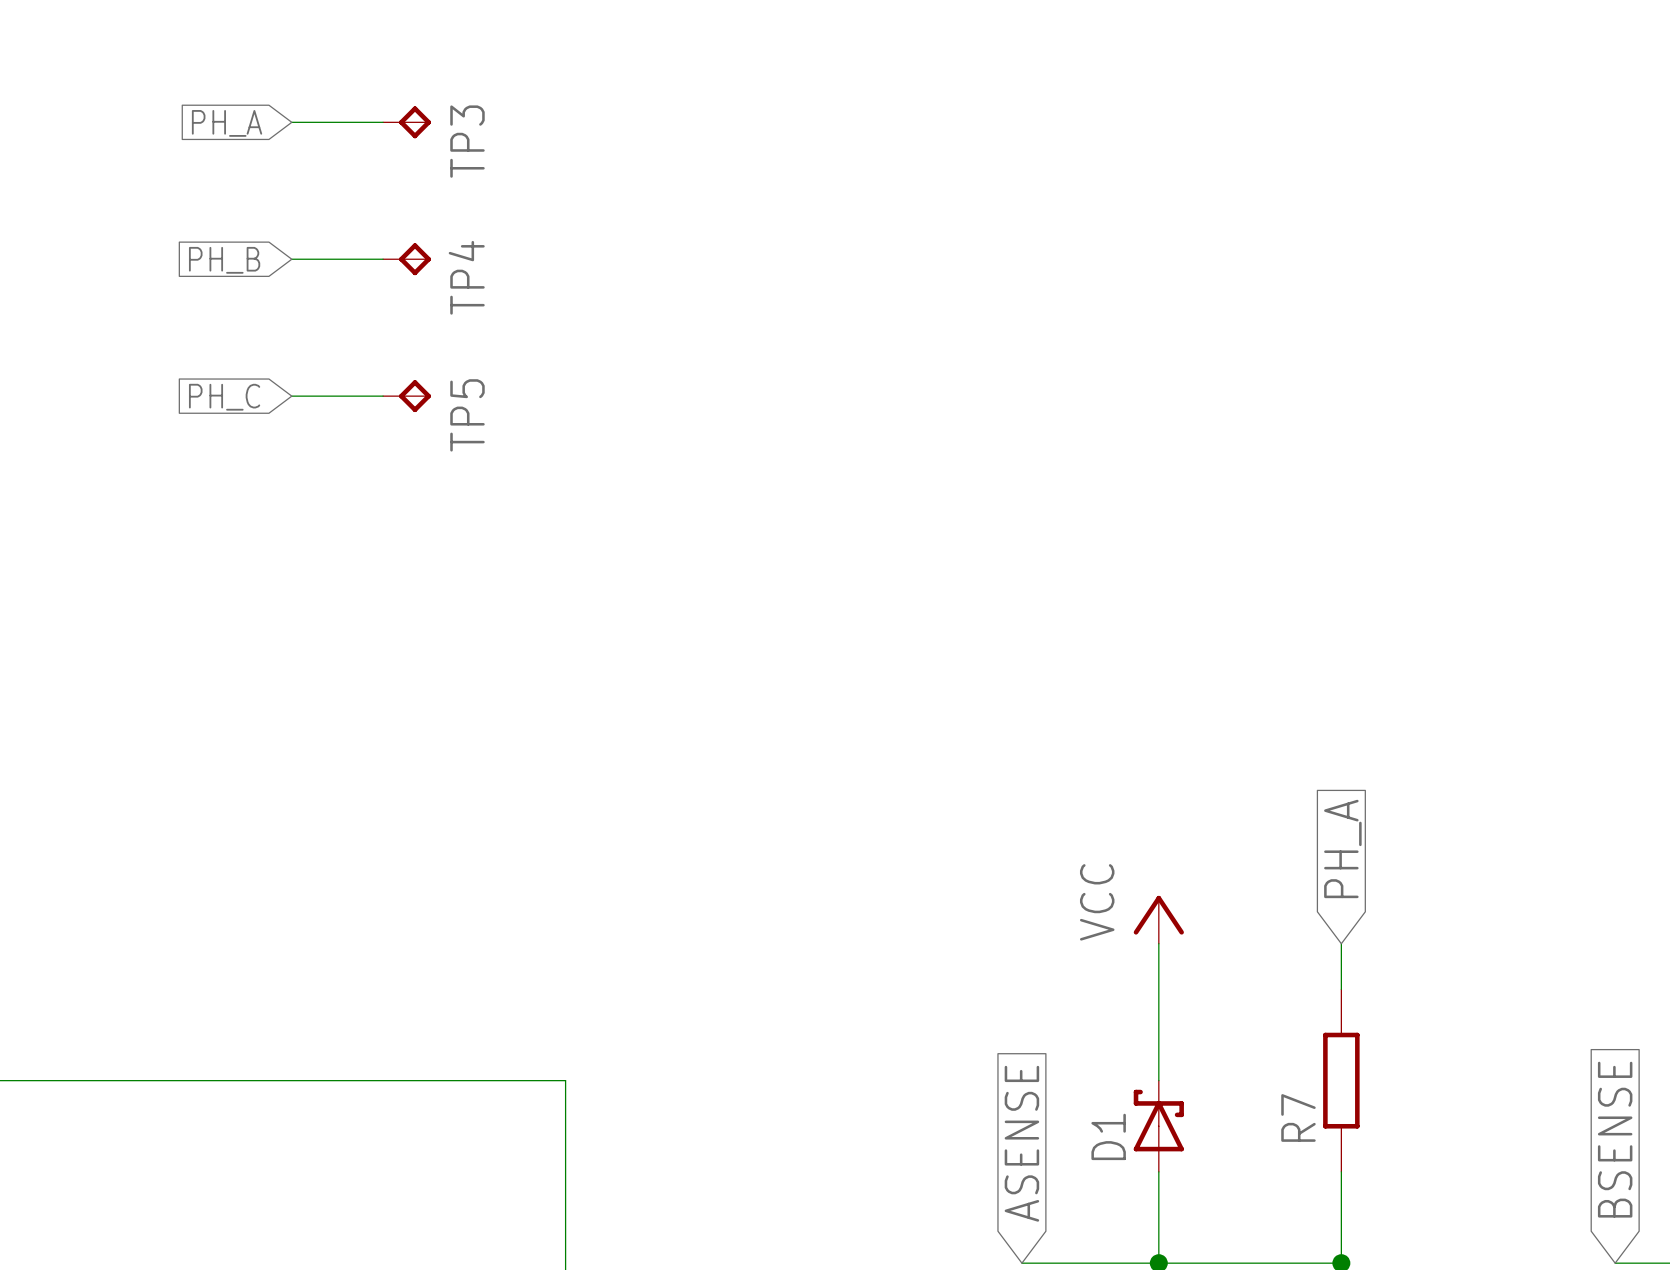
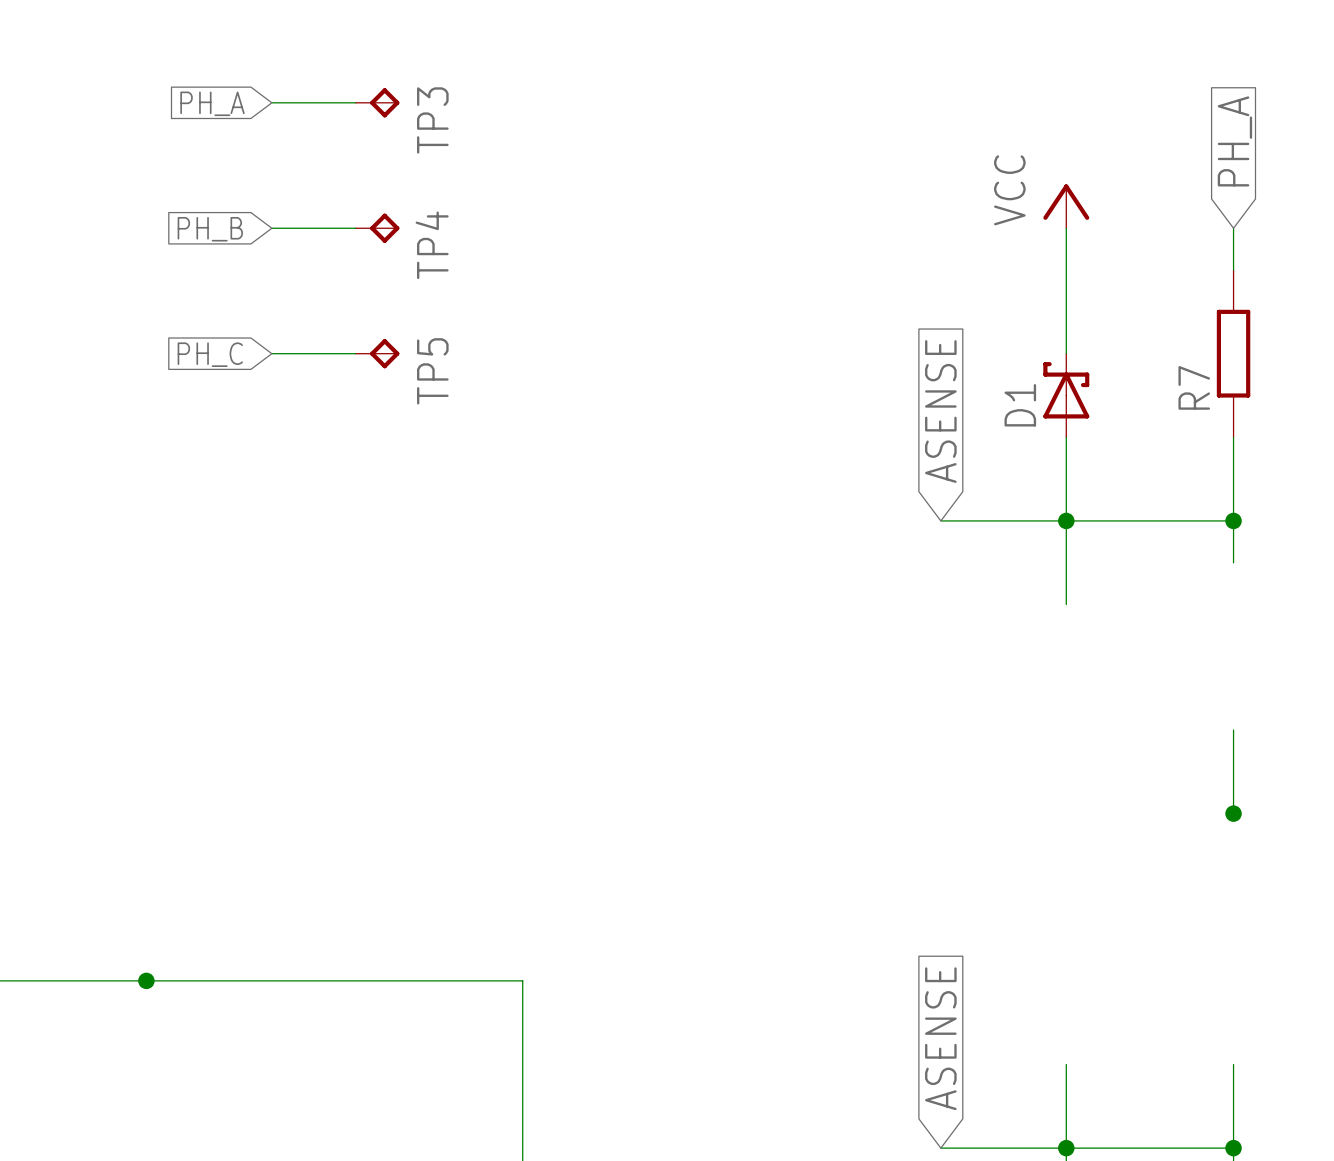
global label: none -> PH_A (1234, 141)
power symbol: none -> VCC (1066, 206)
wire: none -> (1066, 228) (1066, 353)
wire: none -> (1233, 228) (1233, 270)
global label: none -> ASENSE (940, 411)
wire: none -> (1066, 437) (1066, 604)
wire: none -> (1233, 437) (1233, 562)
wire: none -> (940, 520) (1233, 520)
junction: none -> (1066, 520)
junction: none -> (1233, 520)
wire: none -> (1233, 730) (1233, 813)
global label: PH_A (1342, 848) -> none
junction: none -> (1233, 813)
power symbol: VCC (1158, 919) -> none
wire: (1158, 943) (1158, 1080) -> none
wire: (1341, 943) (1341, 989) -> none
junction: none -> (146, 980)
R7 position: (1341, 1080) -> (1233, 353)
D1 position: (1158, 1126) -> (1066, 395)

